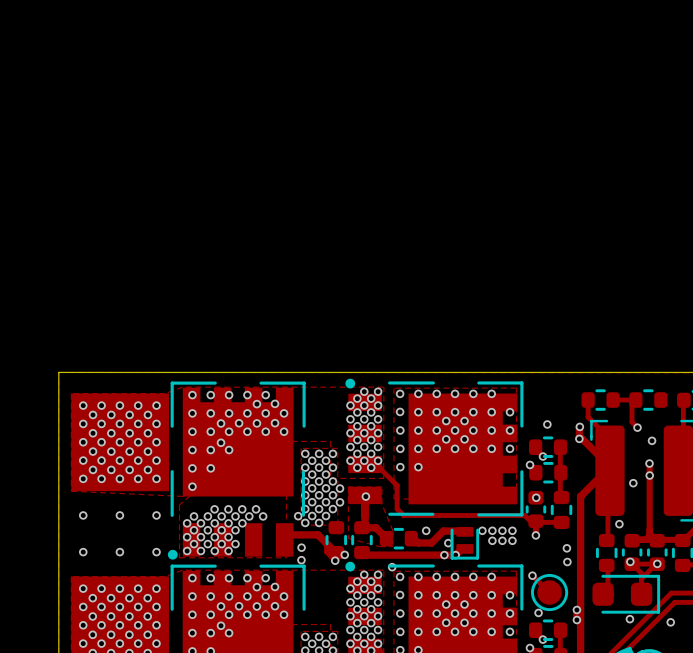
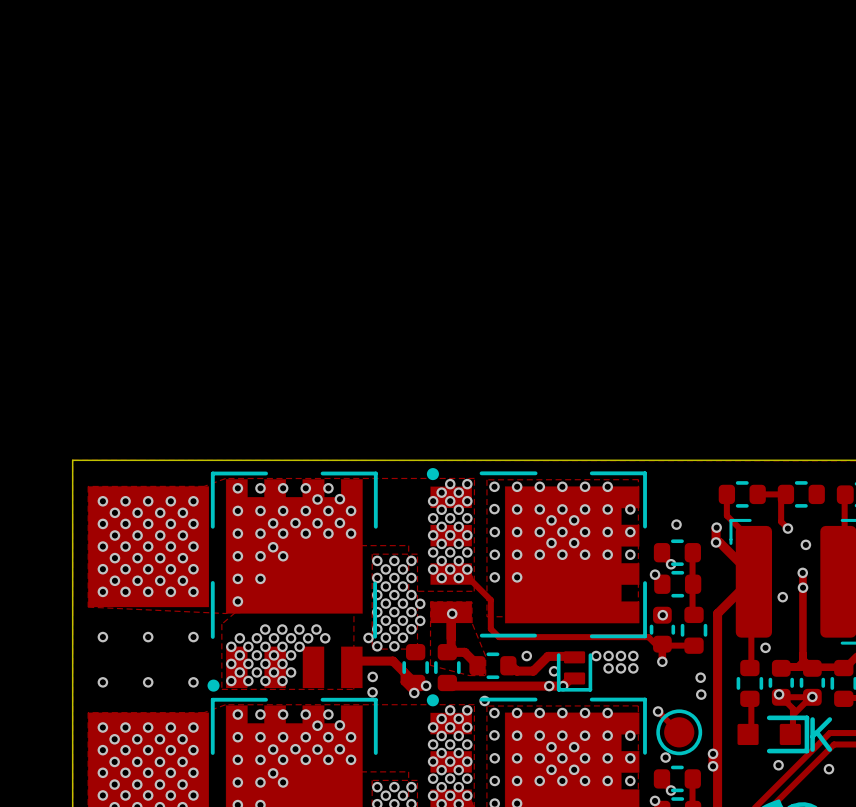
part footprint: [592, 574, 661, 614] -> [737, 715, 810, 754]

